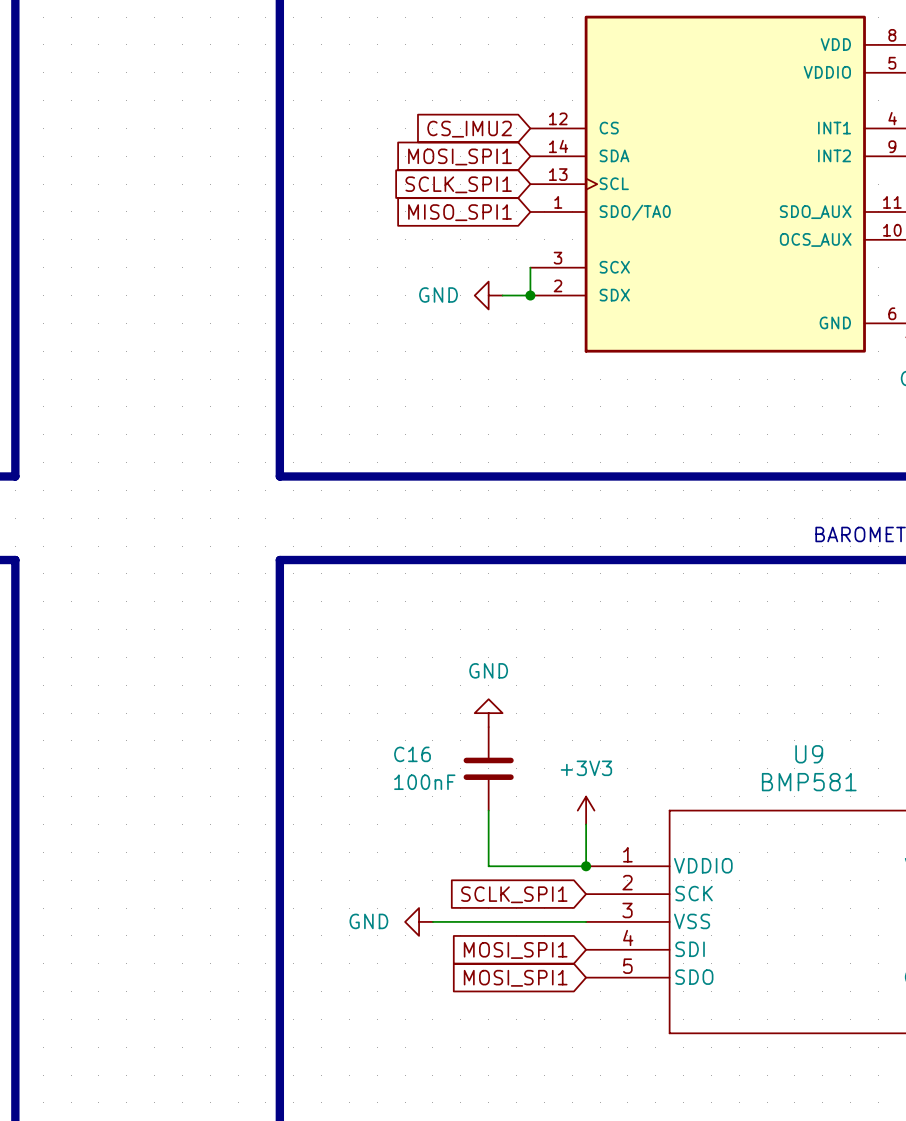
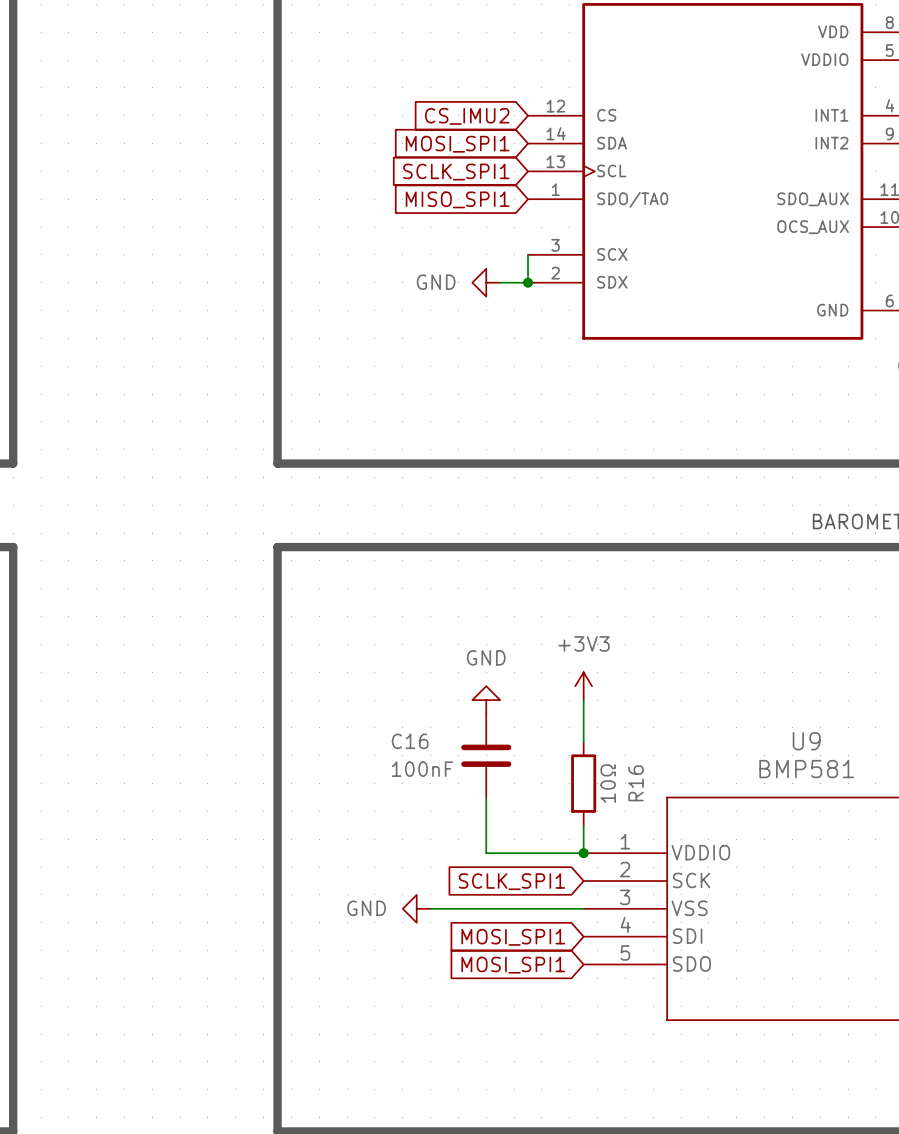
wire: none -> (583, 700) (583, 741)
R16: none -> 10Ω (583, 783)
power symbol position: +3V3 (586, 810) -> +3V3 (583, 686)

